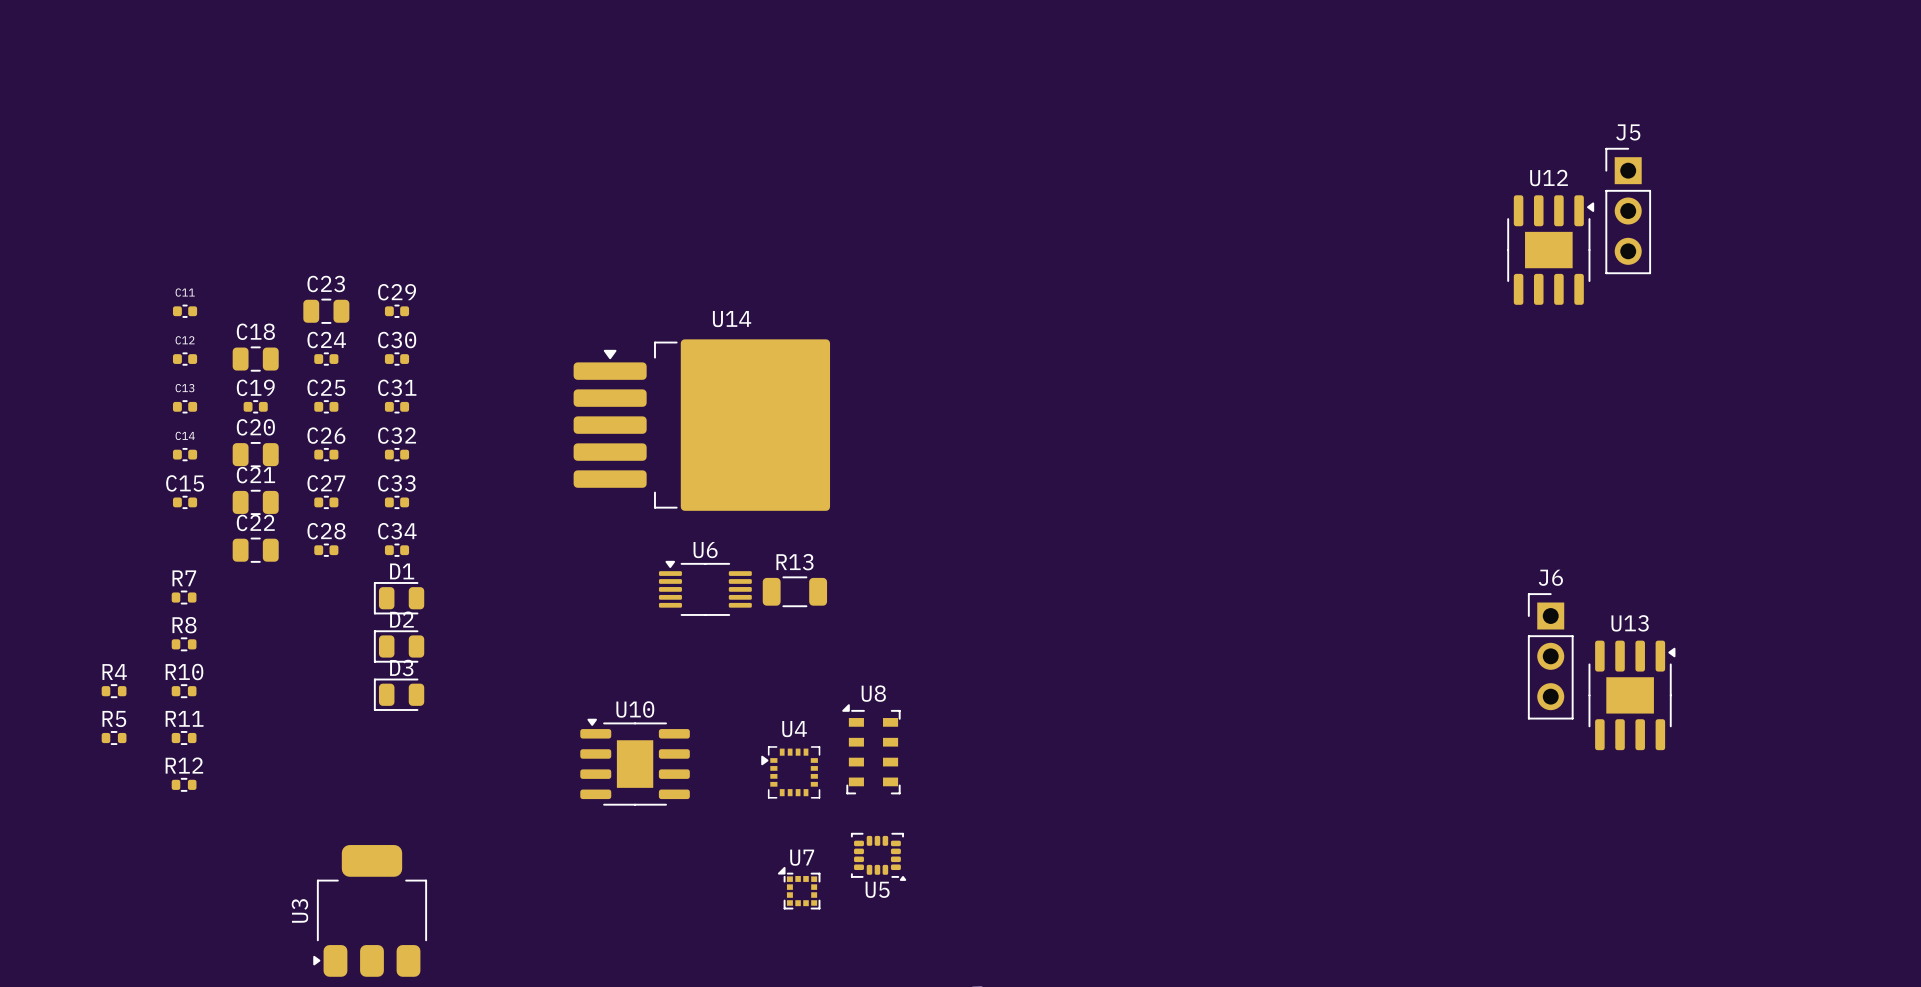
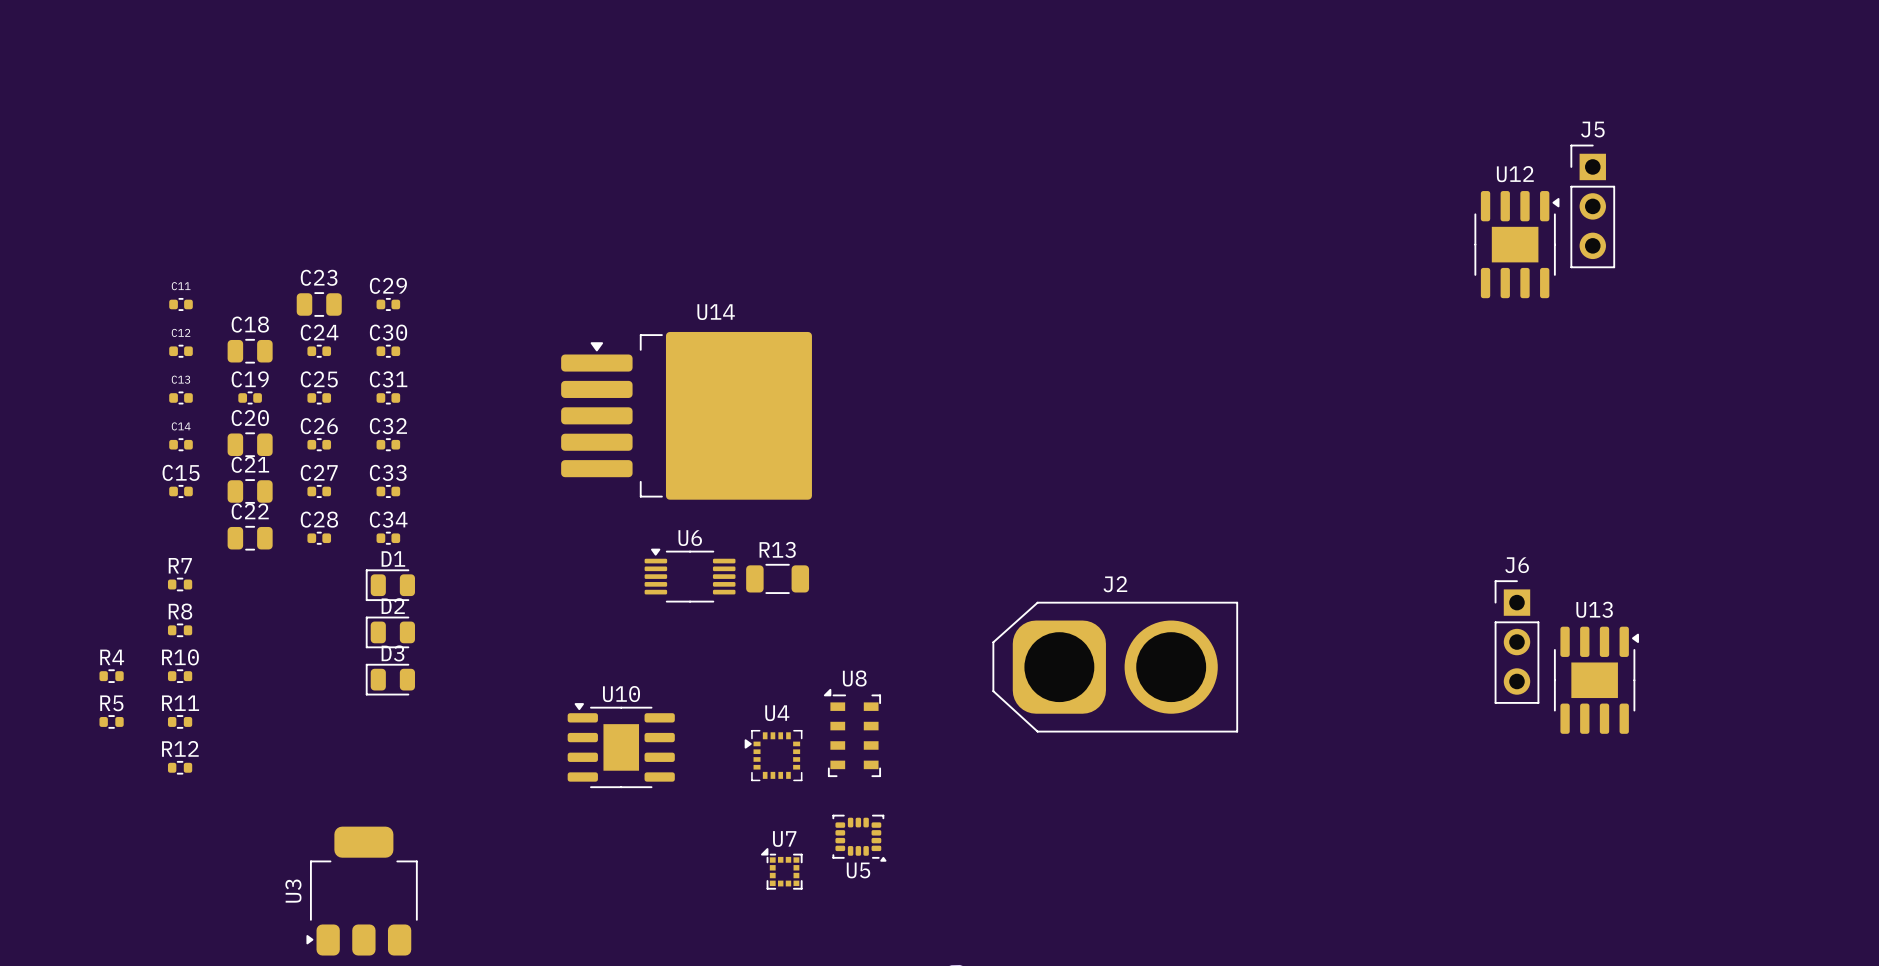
J2: none -> (1115, 667)

